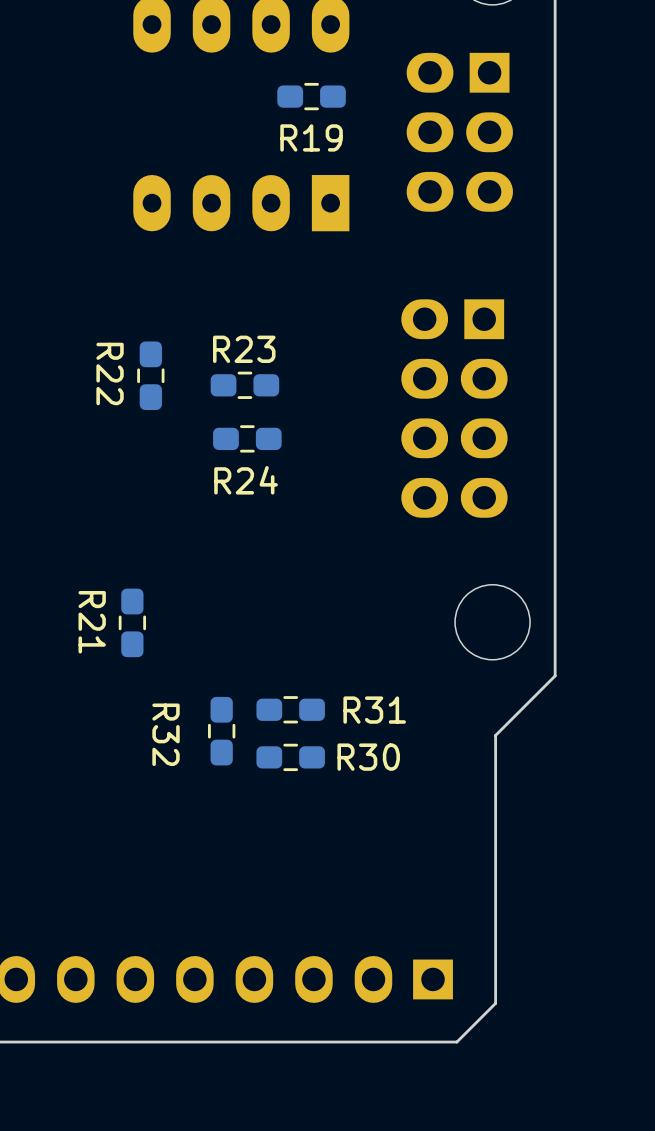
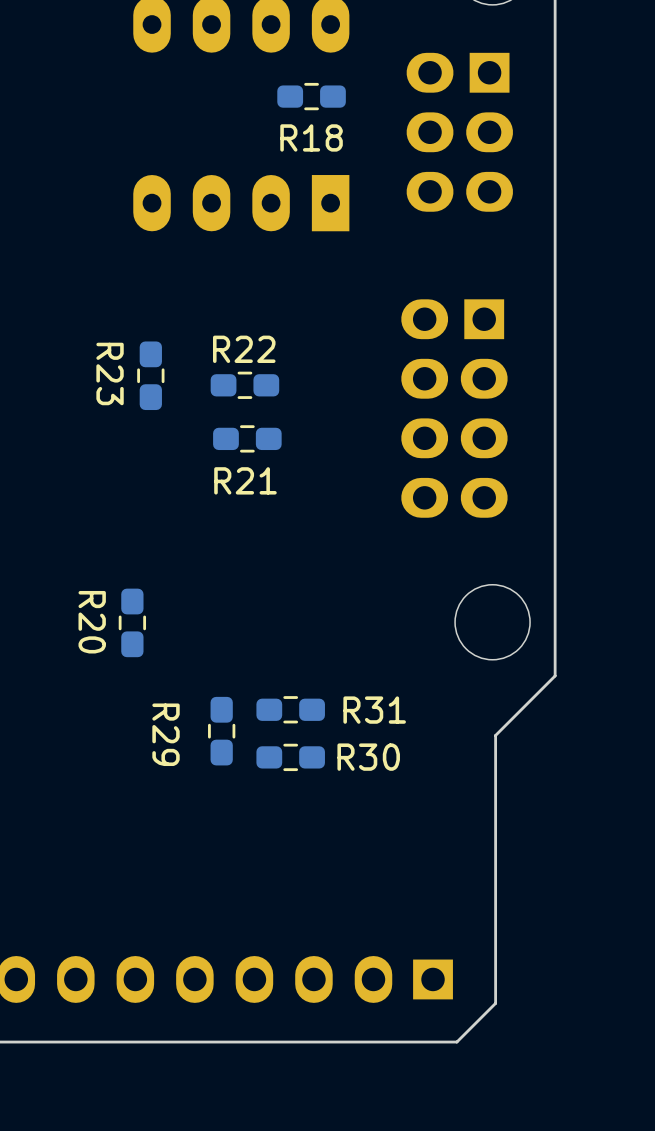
R19 name: R19 (311, 137) -> R18 (311, 137)
R23 name: R23 (244, 349) -> R22 (244, 349)
R22 name: R22 (110, 373) -> R23 (110, 373)
R24 name: R24 (246, 480) -> R21 (245, 480)
R21 name: R21 (92, 622) -> R20 (92, 622)
R32 name: R32 (166, 734) -> R29 (166, 734)

